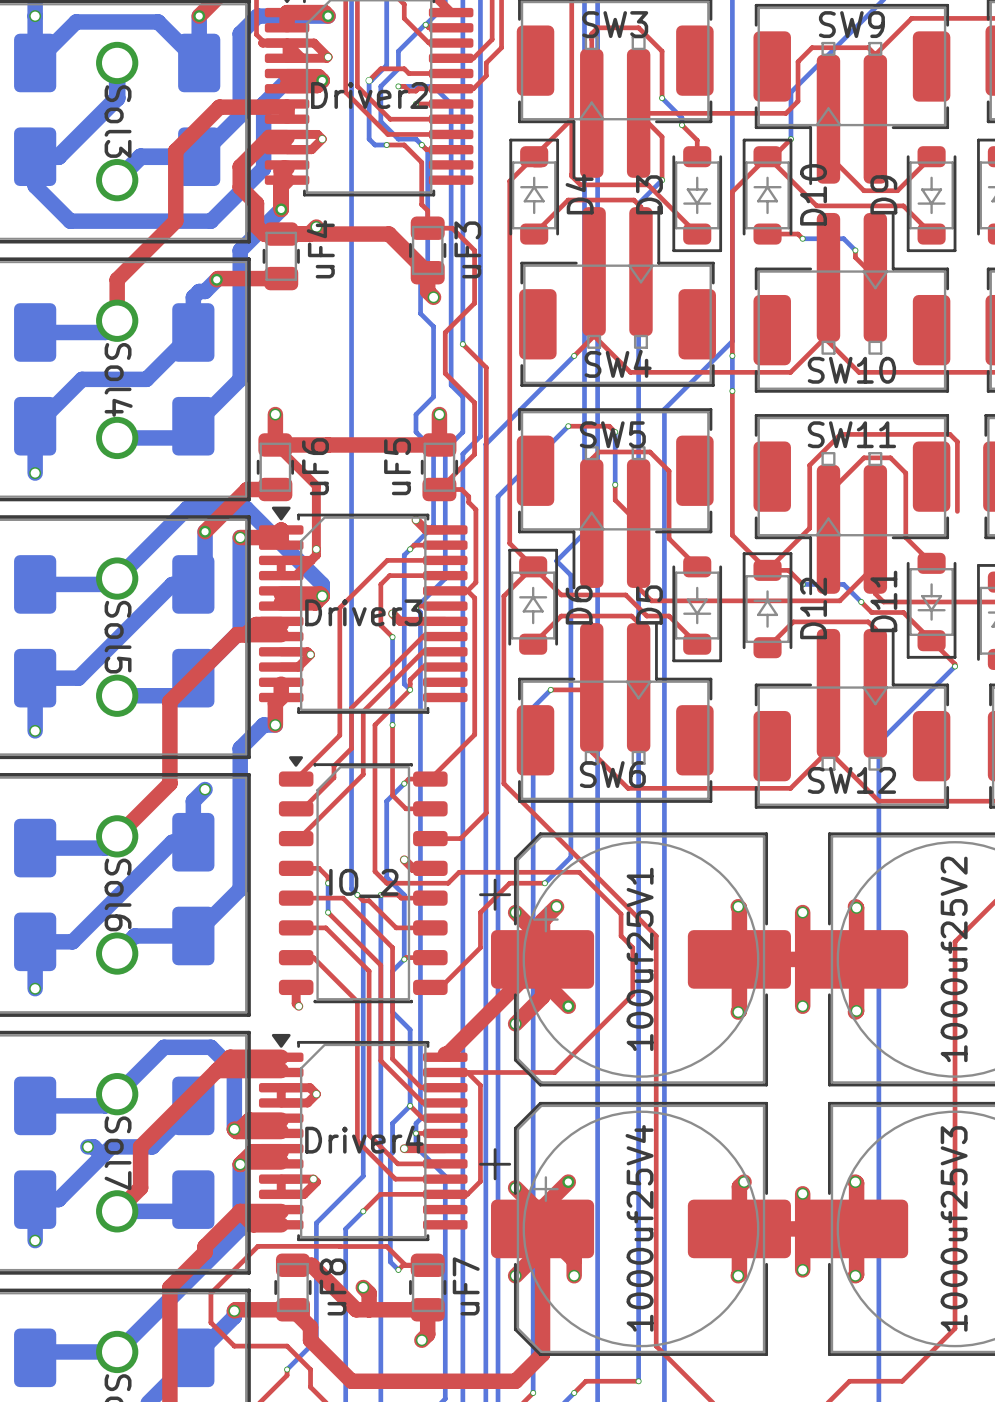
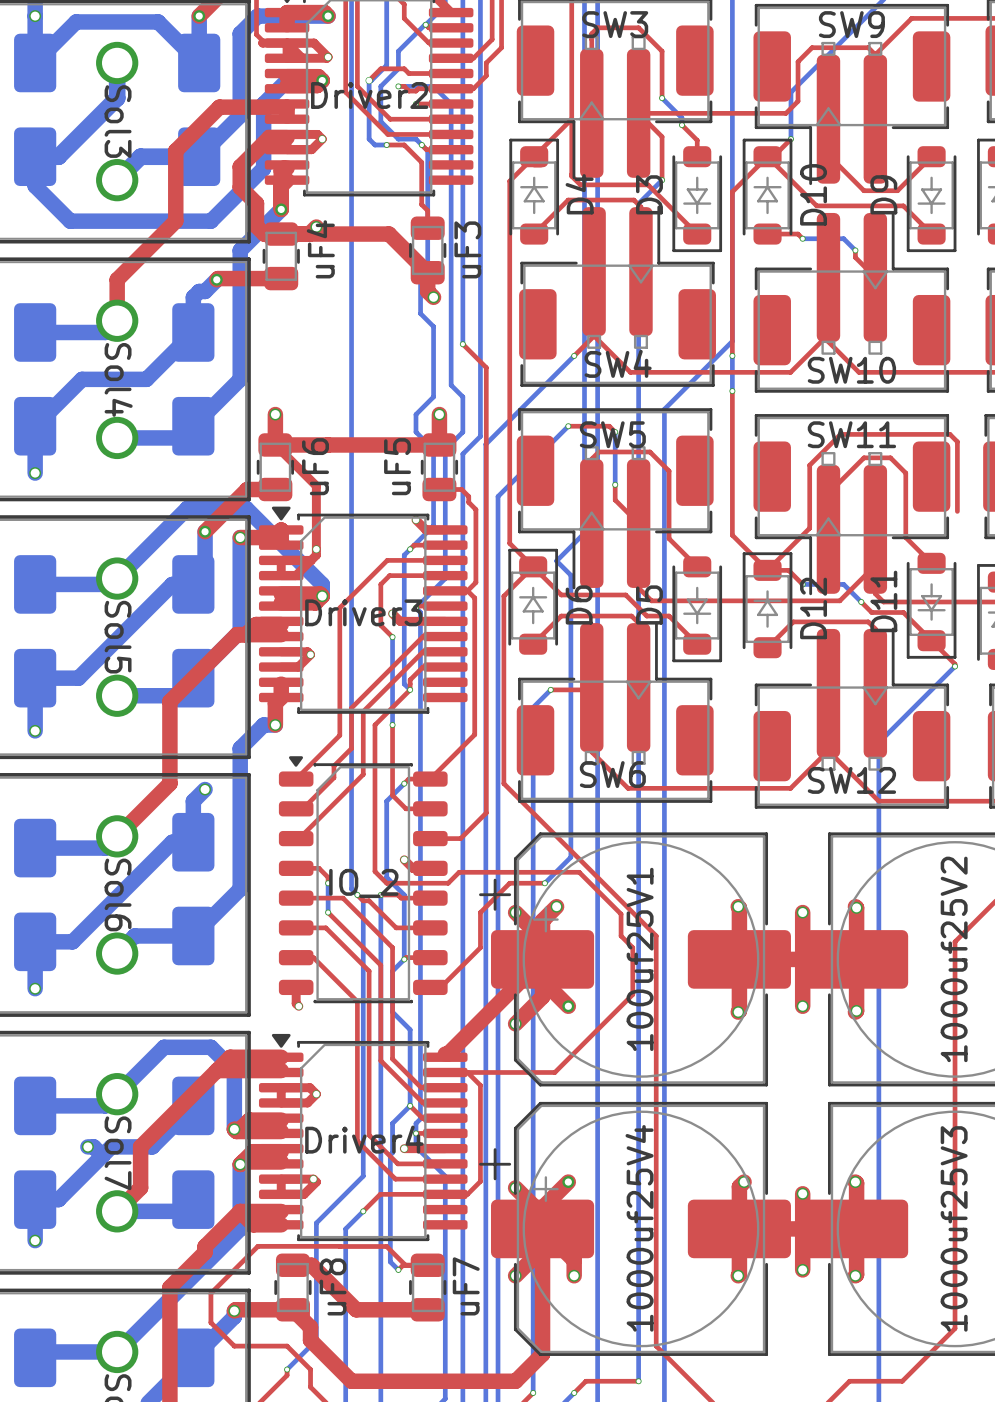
top track: (427, 228) (452, 228) (474, 250) (474, 303) (445, 332) (445, 373) (474, 402) (474, 454) (439, 489) -> none
top track: (363, 1287) (369, 1293) (369, 1309) -> none
via: (363, 1287) -> none
top track: (427, 1309) (427, 1334) (421, 1340) -> none
via: (421, 1340) -> none

